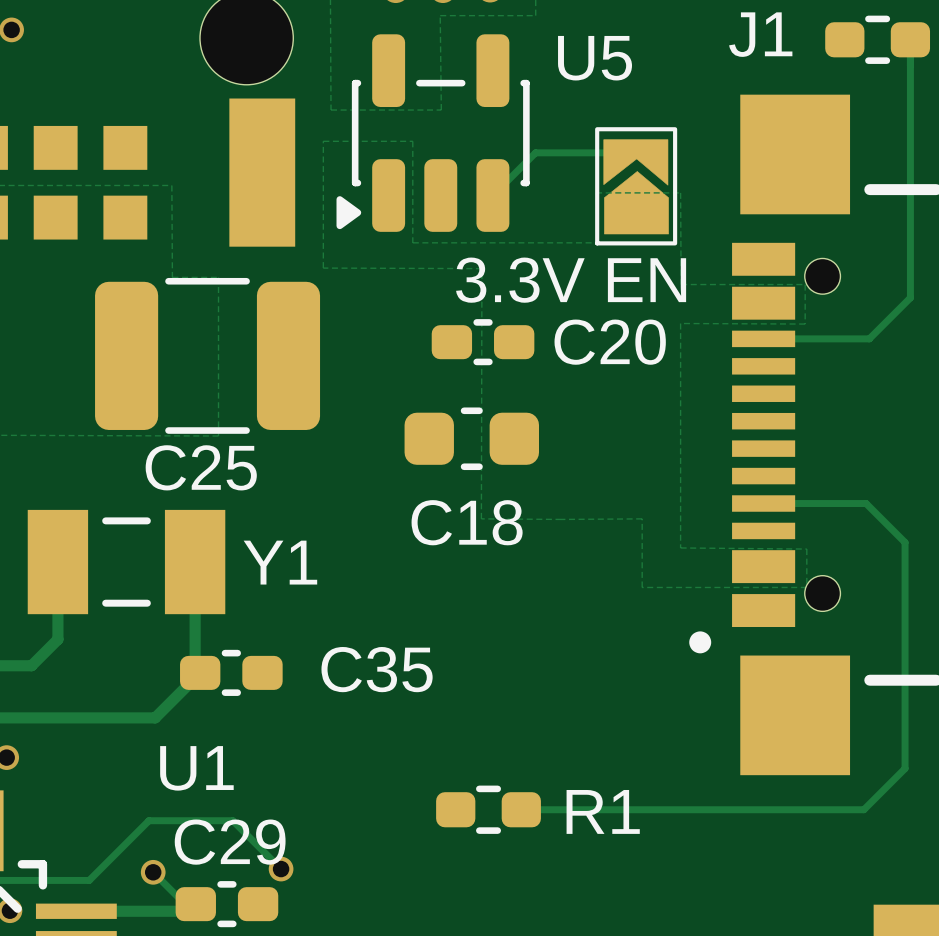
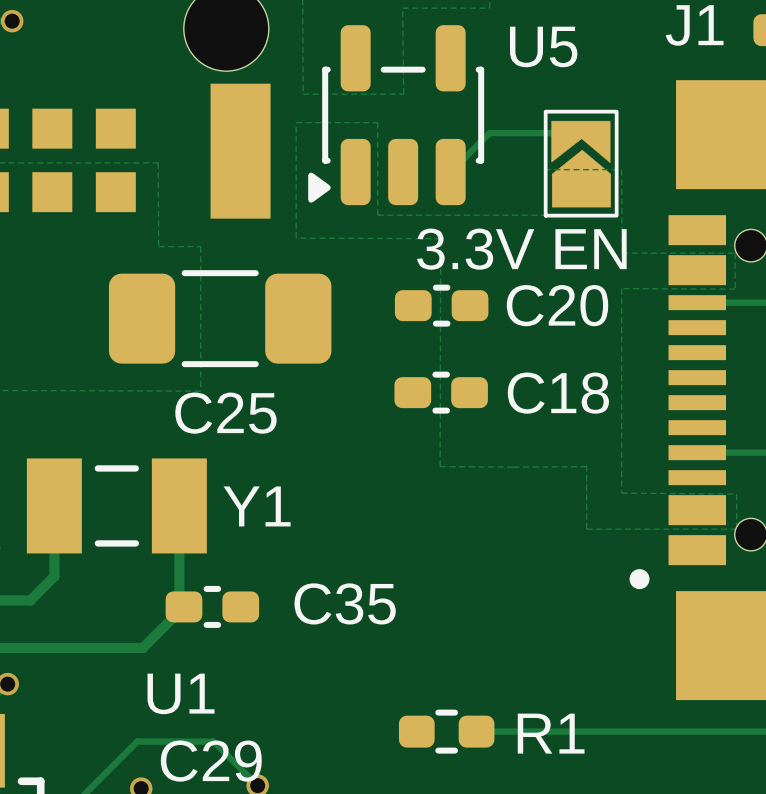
C25 footprint: [95, 277, 321, 434] -> [108, 270, 332, 368]
C18 footprint: [404, 407, 540, 471] -> [394, 371, 488, 414]
C25 name position: C25 (201, 467) -> C25 (225, 413)
C18 name position: C18 (467, 522) -> C18 (558, 393)

